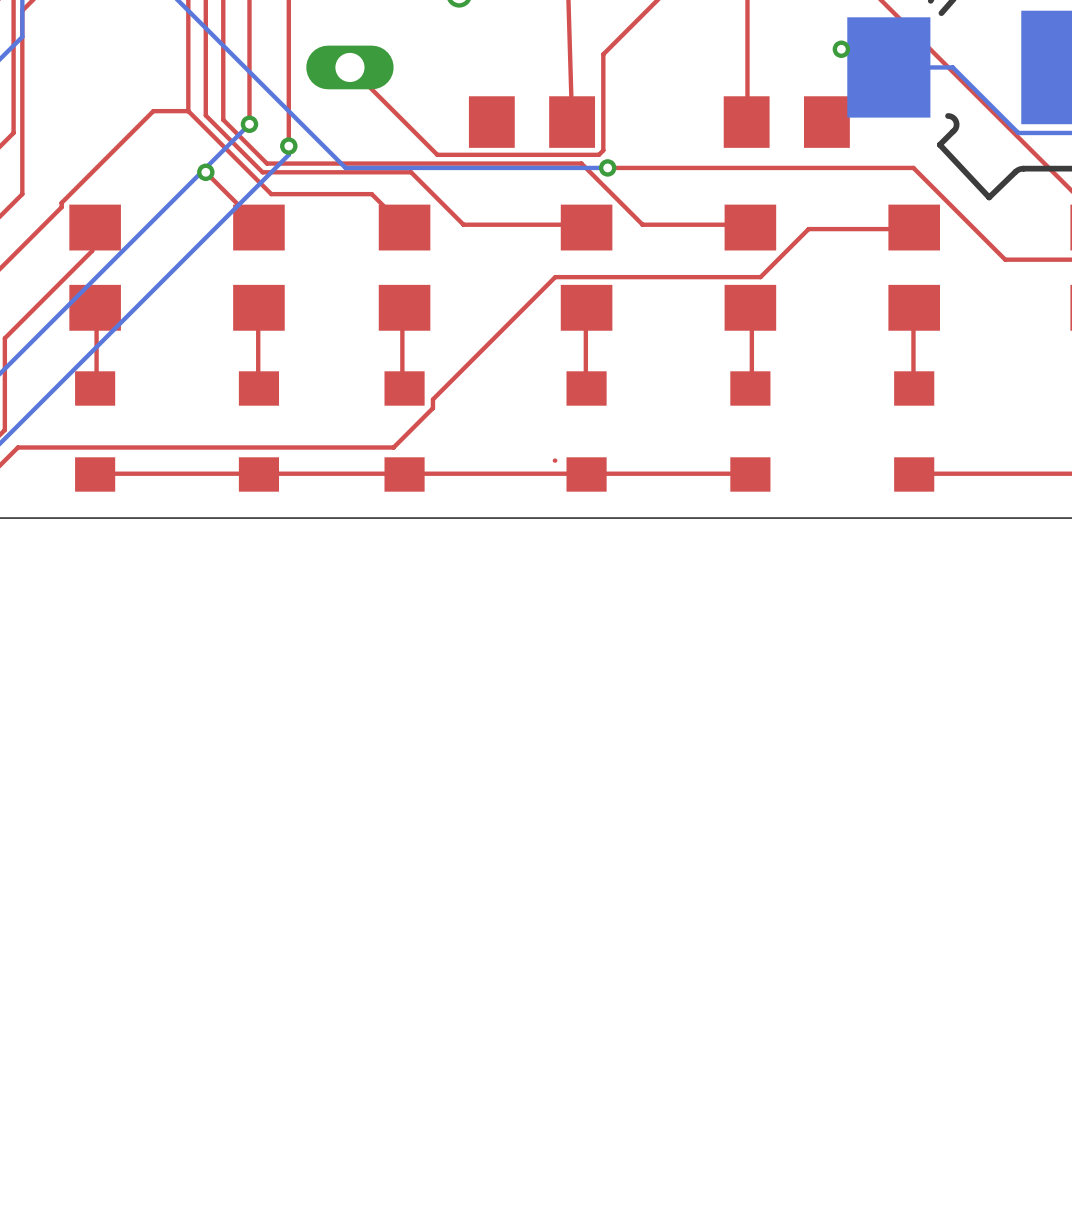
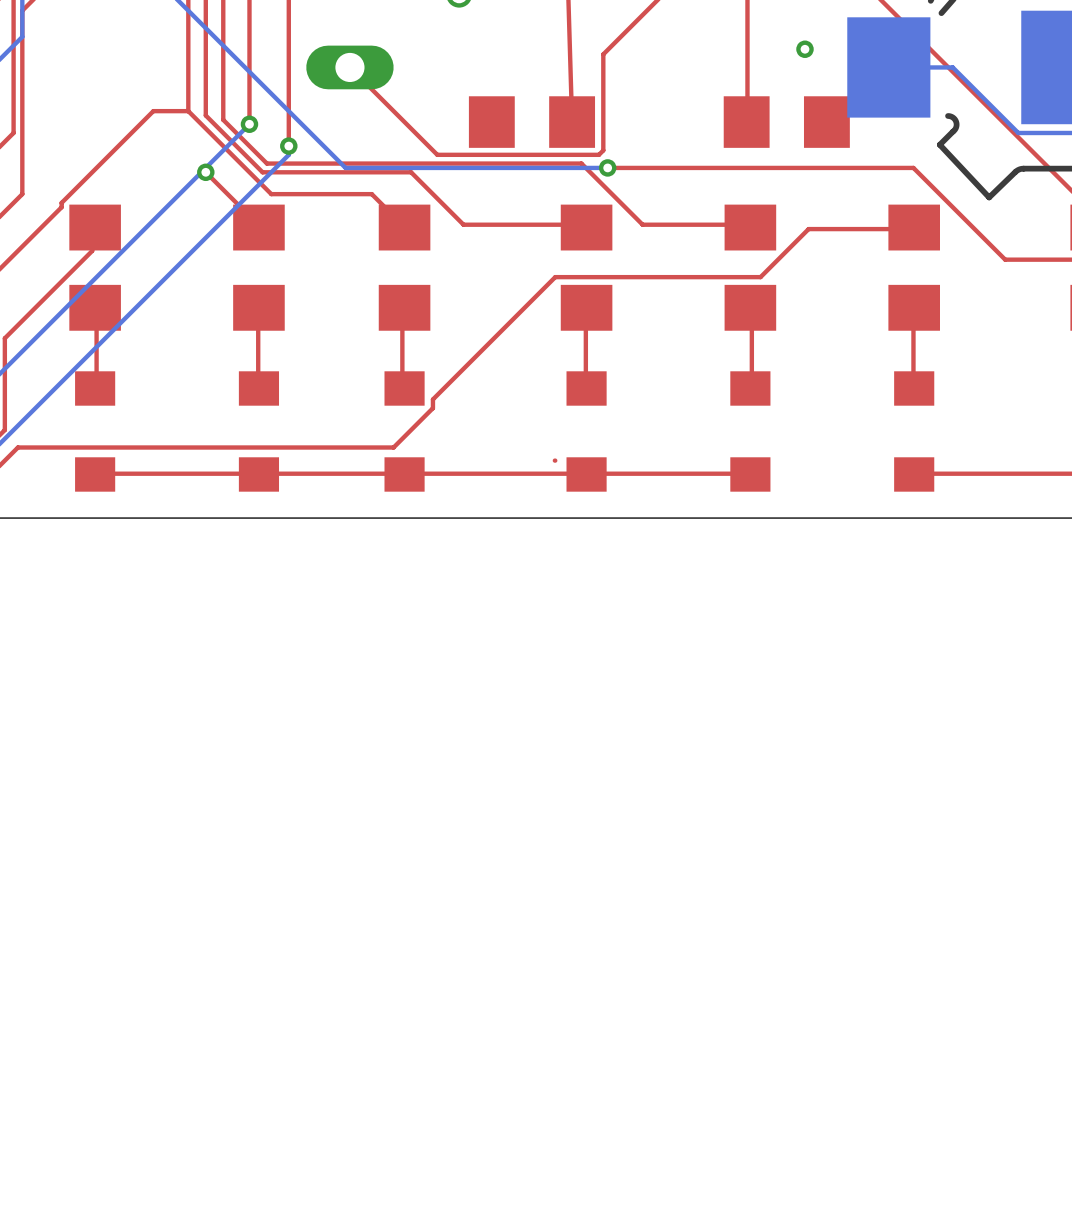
via position: (841, 49) -> (804, 49)

